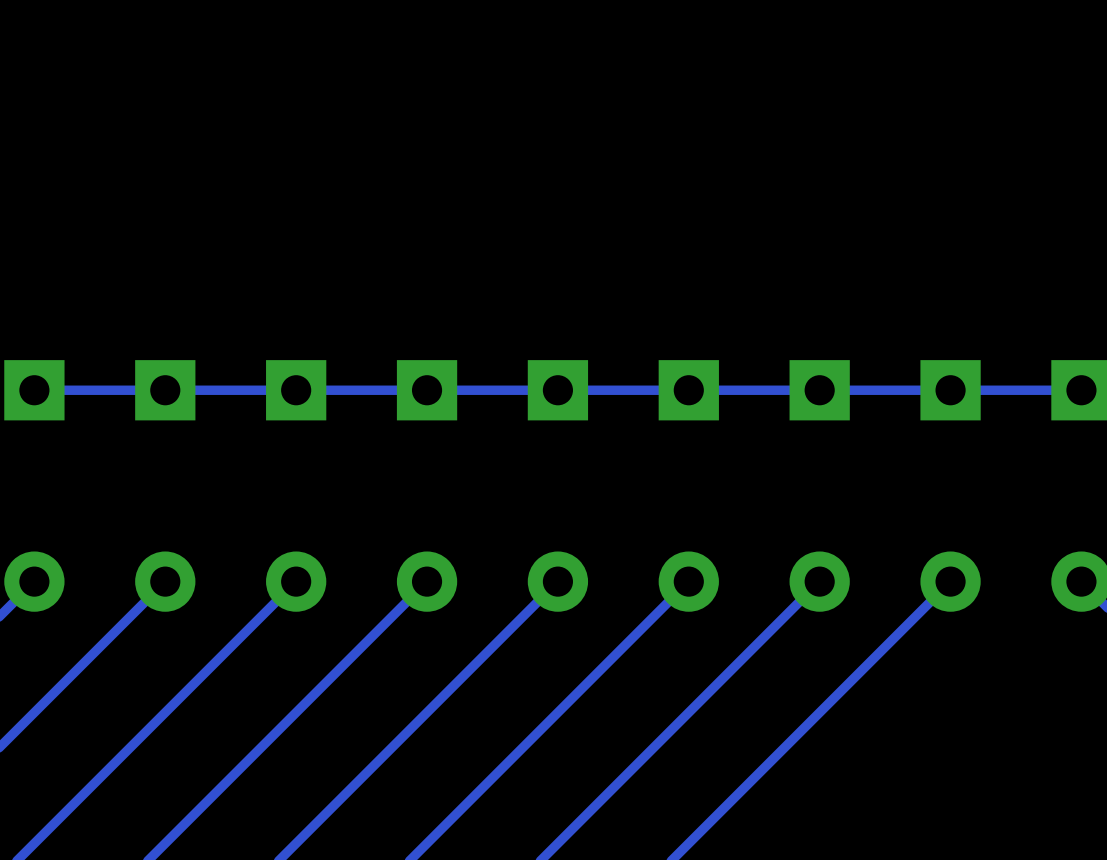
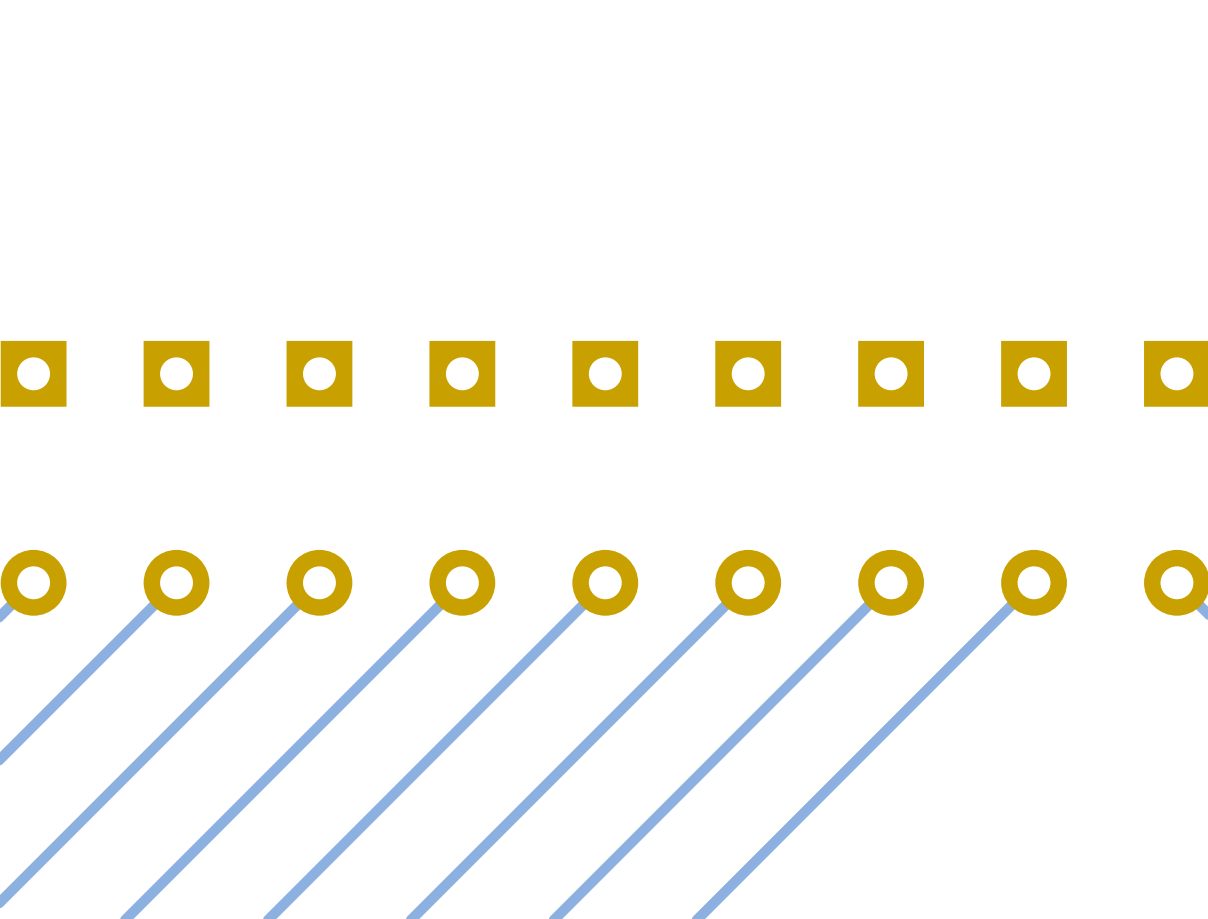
track: (1081, 390) (34, 390) -> none

